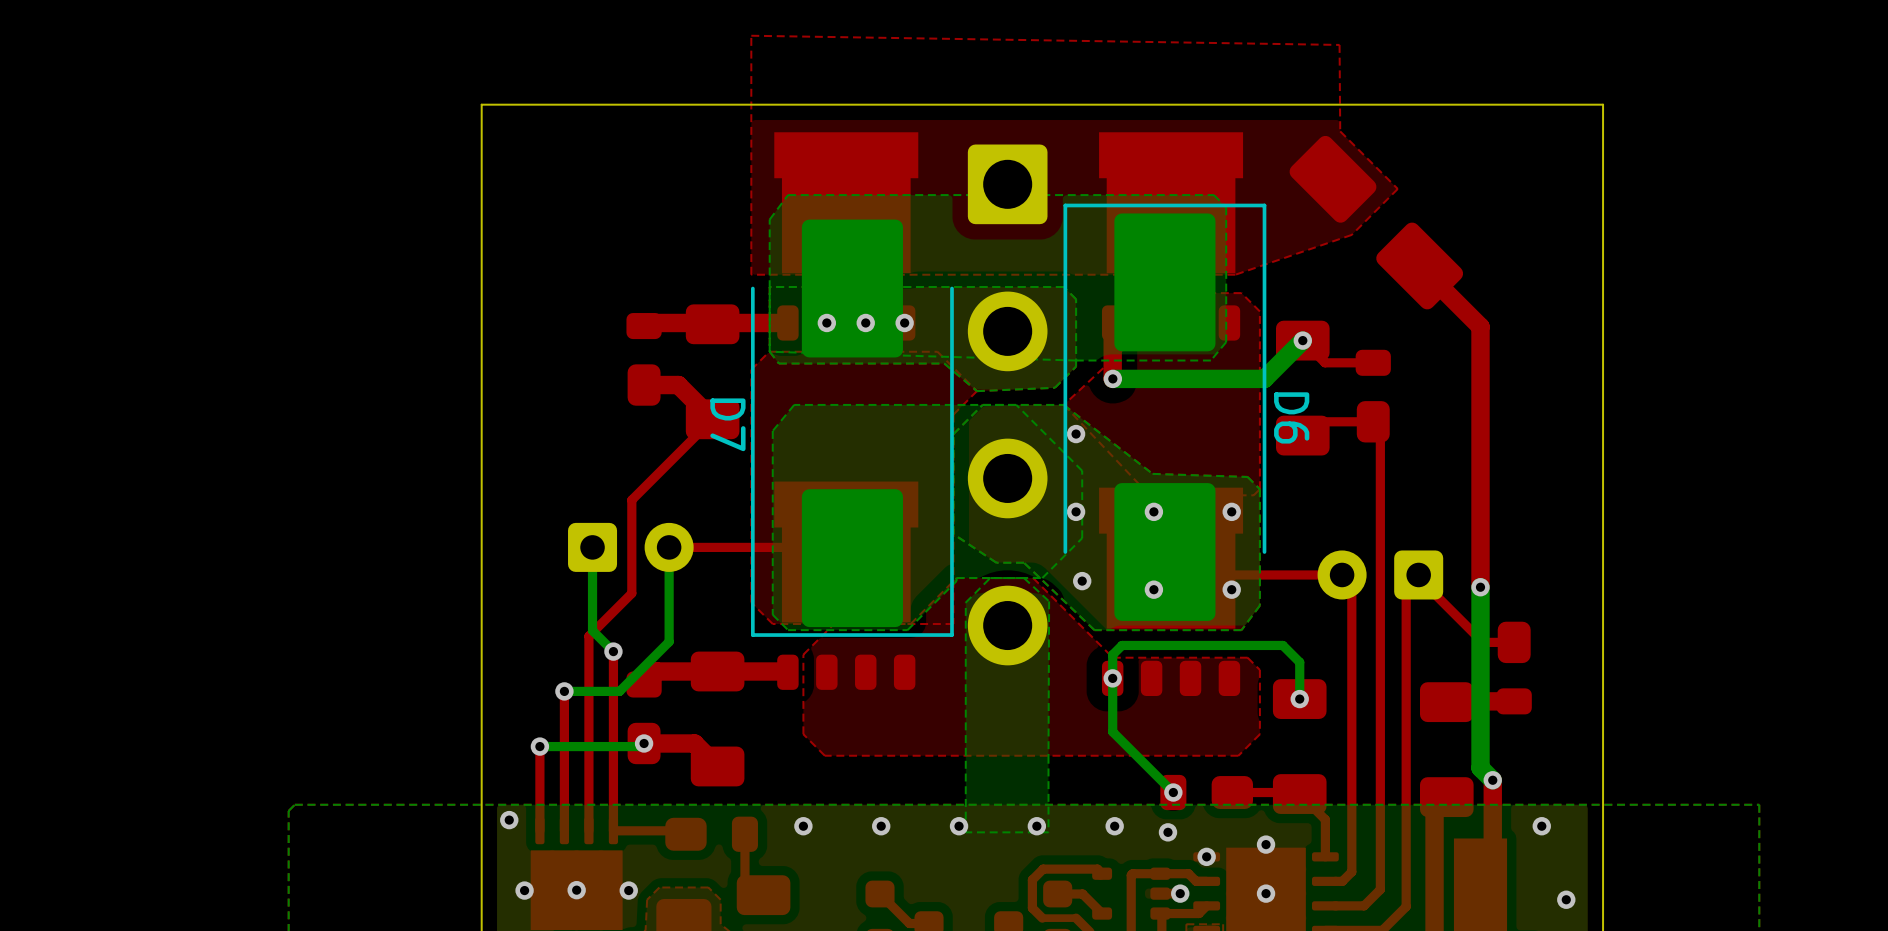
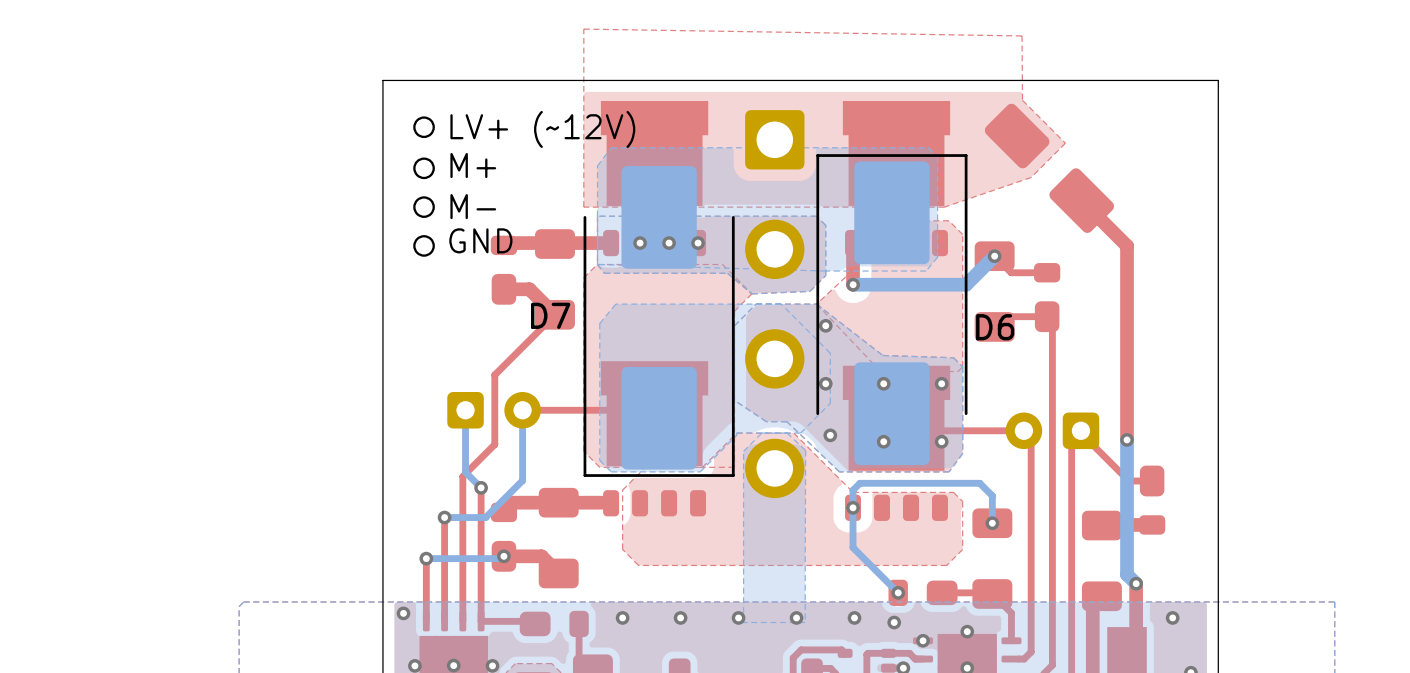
drawing: none -> [413, 116, 435, 257]
text: none -> LV+ (~12V) (542, 129)
text: none -> M+ (473, 165)
text: none -> M- (473, 206)
text: none -> GND (480, 240)
D6 name rotation: 0° (1291, 417) -> 90° counterclockwise (995, 327)
D7 name rotation: 0° (727, 424) -> 90° counterclockwise (550, 315)

